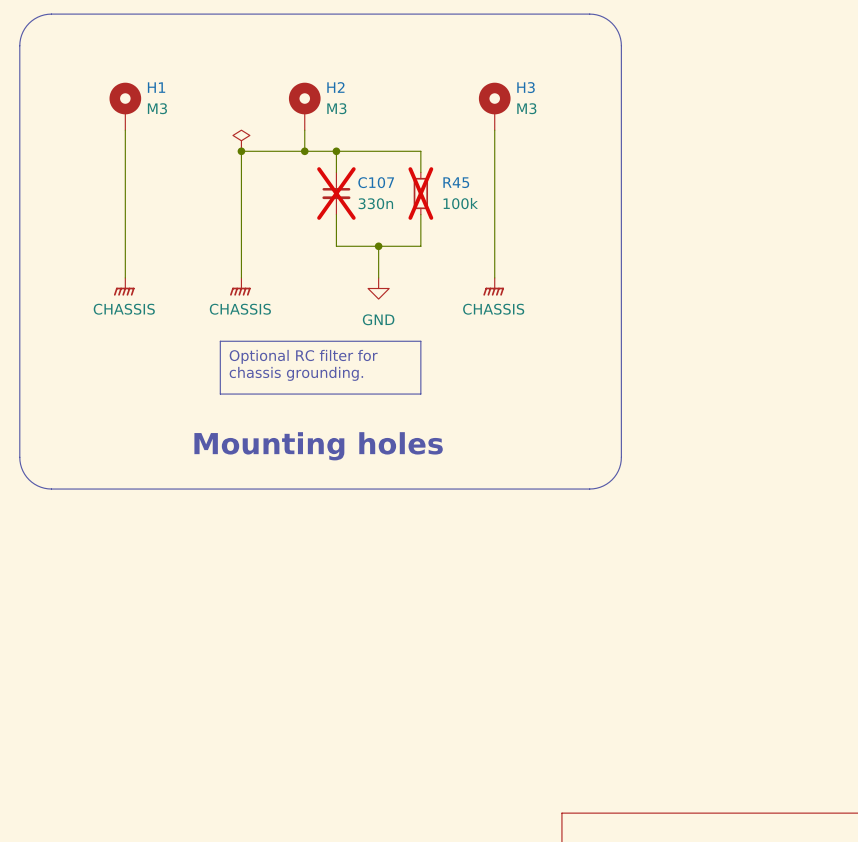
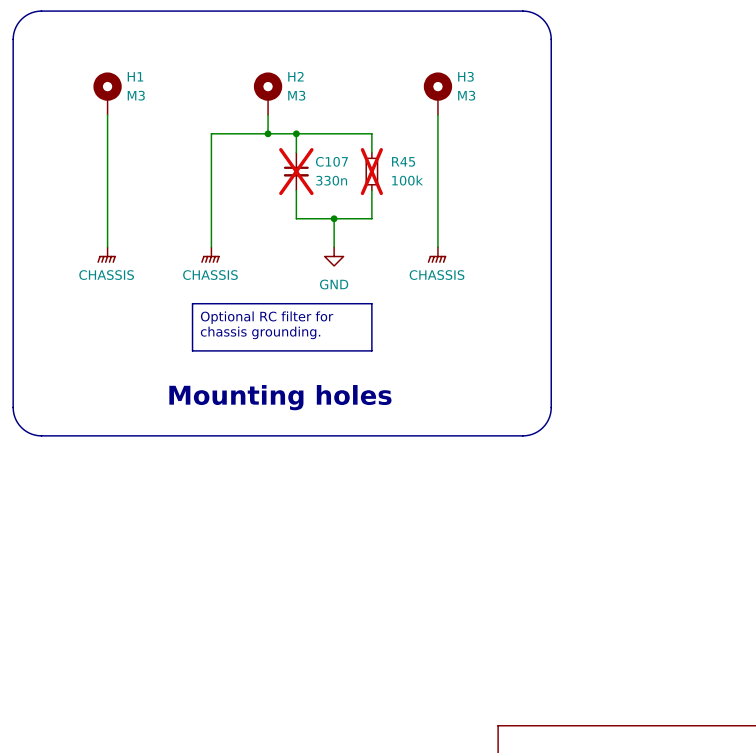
power symbol: (241, 140) -> none
junction: (241, 151) -> none

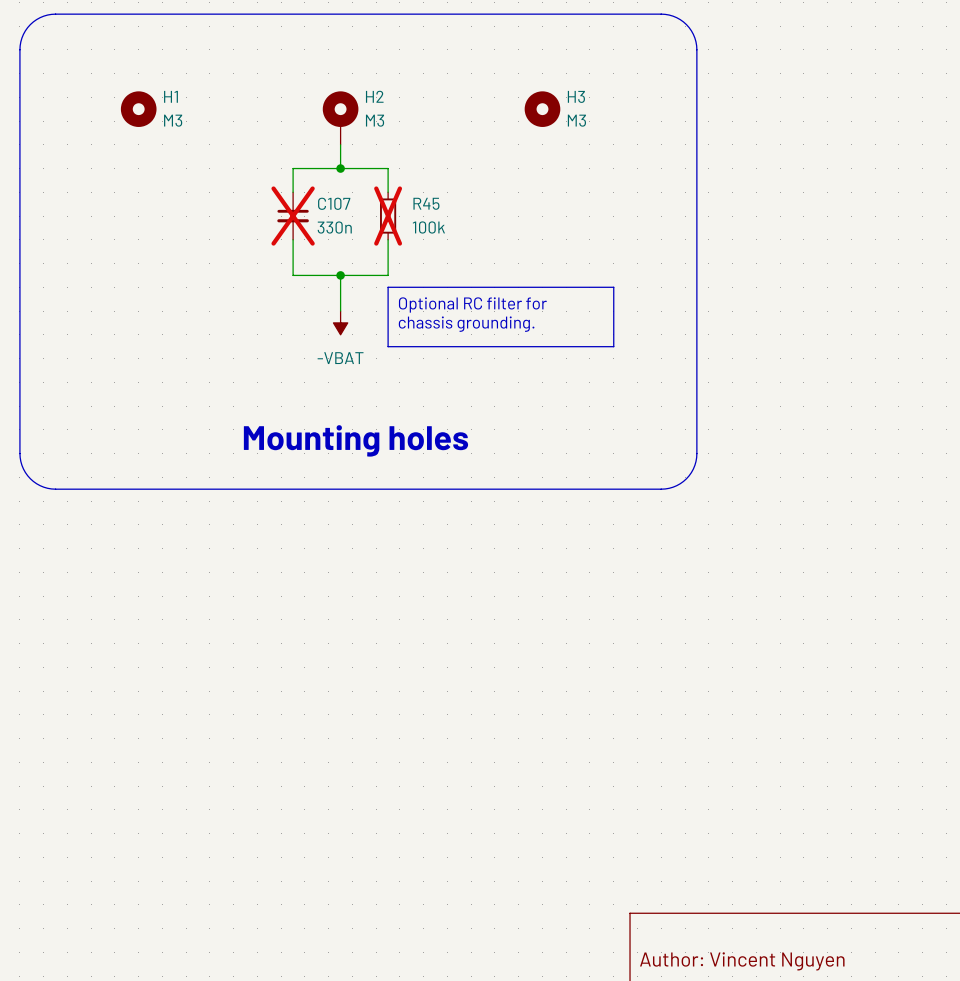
H1 symbol: [93, 72, 122, 115] -> [120, 91, 157, 127]
H3 symbol: [423, 72, 453, 115] -> [524, 91, 561, 127]
wire: (107, 114) (107, 247) -> none
wire: (437, 114) (437, 247) -> none
wire: (230, 133) (211, 133) (211, 247) -> (293, 168) (293, 192)
wire: (296, 133) (296, 152) -> none
junction: (296, 133) -> none
wire: (305, 133) (371, 133) (371, 152) -> (388, 168) (388, 192)
C107 position: (296, 171) -> (293, 216)
R45 position: (371, 171) -> (388, 216)
wire: (296, 190) (296, 218) -> (293, 239) (293, 275) (376, 275)
wire: (371, 190) (371, 218) (305, 218) -> (388, 239) (388, 275)
junction: none -> (340, 275)
wire: (334, 218) (334, 247) -> (340, 275) (340, 311)
junction: (334, 218) -> none
power symbol: CHASSIS (106, 255) -> none
power symbol: CHASSIS (210, 255) -> none
power symbol: CHASSIS (437, 255) -> none
power symbol: none -> -VBAT (340, 322)
power symbol: GND (334, 256) -> none
line: (192, 303) (371, 303) (371, 350) (192, 350) (192, 303) -> (388, 287) (613, 287) (613, 346) (388, 346) (388, 287)
text position: Optional RC filter for (267, 317) -> Optional RC filter for (472, 304)
text position: chassis grounding. (260, 332) -> chassis grounding. (466, 324)
line: (13, 360) (14, 416) (23, 429) (32, 434) (41, 435) (526, 435) (540, 429) (549, 416) (551, 360) -> (19, 453) (23, 469) (30, 478) (43, 487) (55, 489) (665, 488) (680, 483) (689, 475) (694, 465) (696, 453)
text position: Mounting holes (280, 397) -> Mounting holes (355, 440)

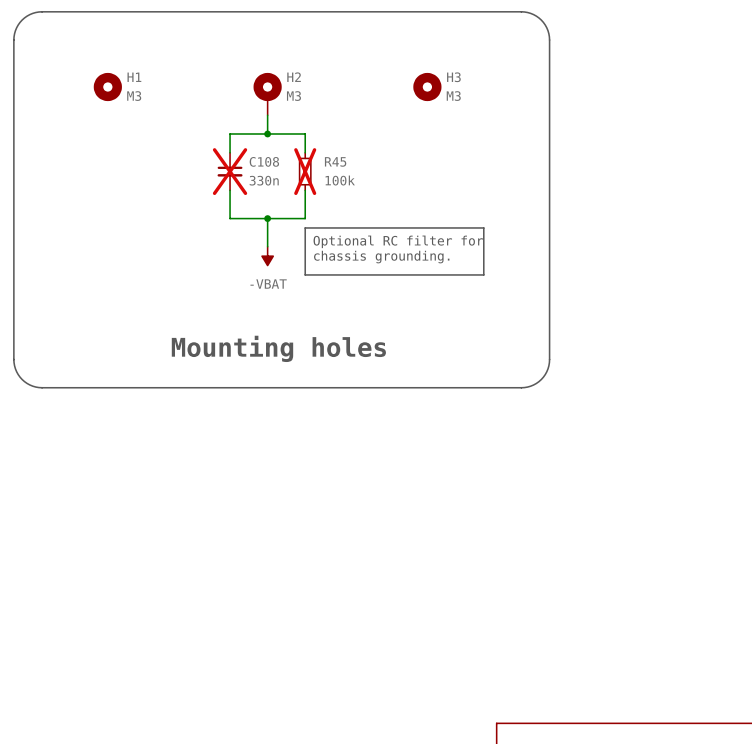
C107 name: C107 (334, 203) -> C108 (264, 161)

